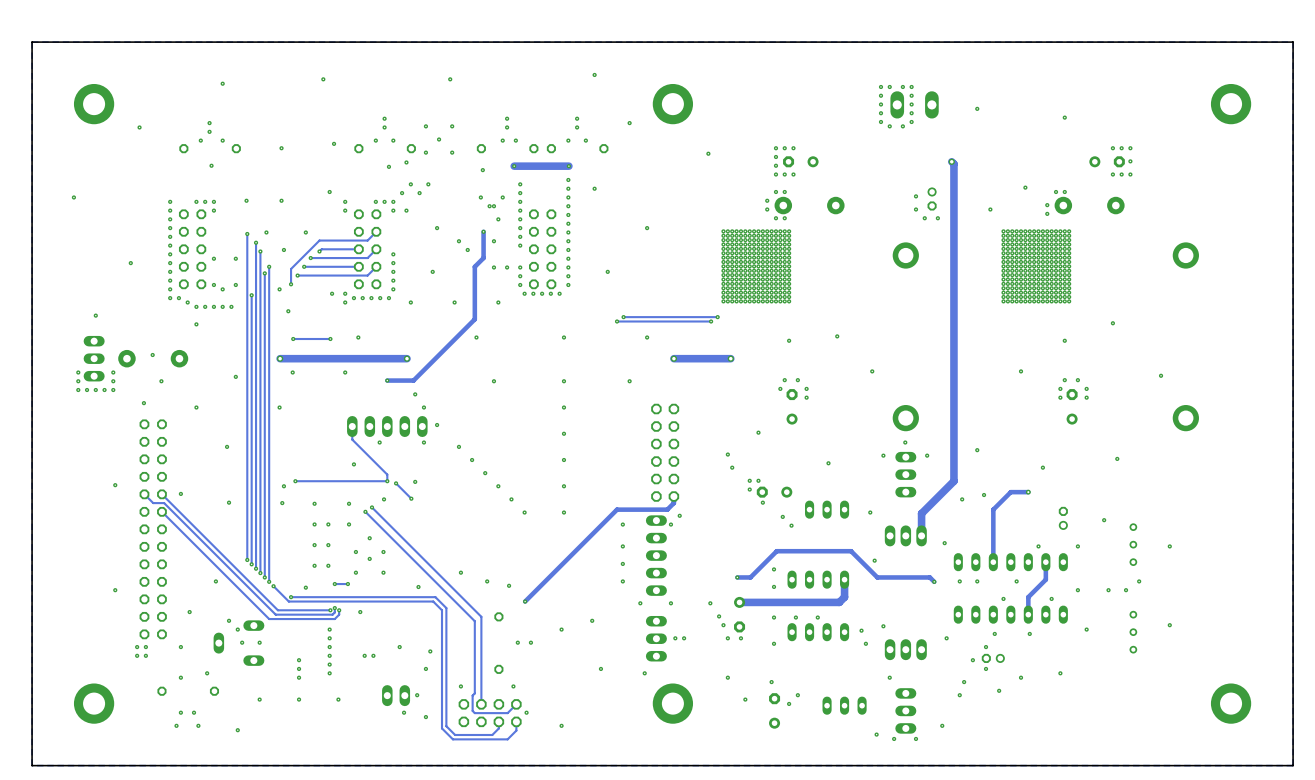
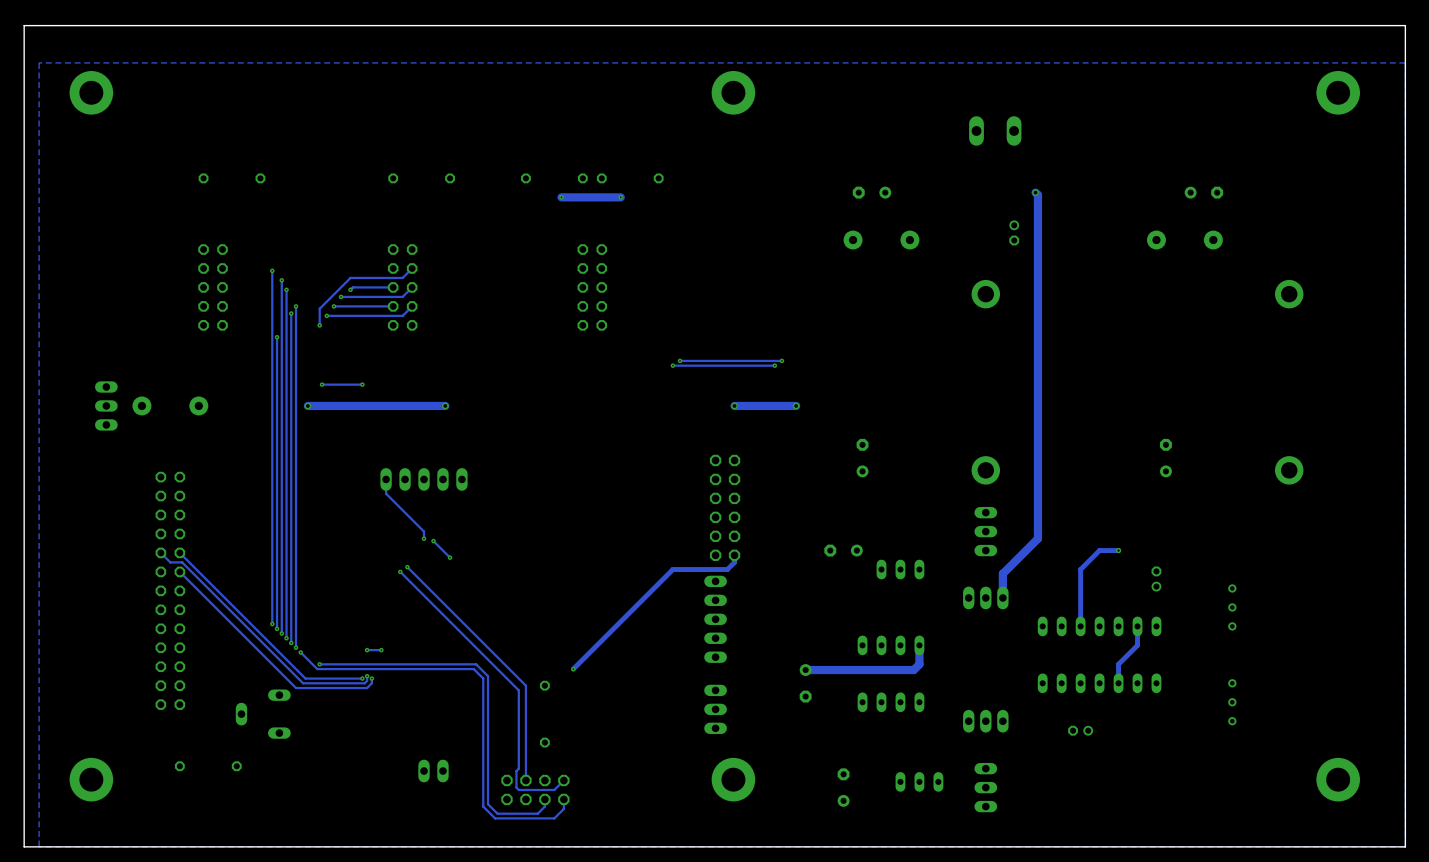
board edge: (1293, 42) (32, 42) (32, 765) -> (1405, 62) (1405, 25) (24, 25) (24, 846) (39, 846)
via: (594, 74) -> none
via: (323, 79) -> none
via: (450, 79) -> none
via: (222, 83) -> none
via: (881, 86) -> none
via: (889, 86) -> none
via: (902, 86) -> none
via: (911, 86) -> none
via: (881, 95) -> none
via: (911, 95) -> none
part position: (94, 104) -> (91, 92)
part position: (672, 104) -> (733, 92)
via: (881, 104) -> none
via: (911, 104) -> none
part position: (1231, 104) -> (1338, 92)
via: (977, 108) -> none
via: (881, 113) -> none
via: (911, 113) -> none
via: (1064, 117) -> none
via: (384, 118) -> none
via: (507, 118) -> none
via: (577, 118) -> none
via: (881, 121) -> none
via: (911, 121) -> none
via: (209, 123) -> none
via: (629, 123) -> none
via: (425, 126) -> none
via: (452, 126) -> none
via: (889, 126) -> none
via: (902, 126) -> none
via: (139, 127) -> none
via: (384, 127) -> none
via: (507, 127) -> none
via: (577, 127) -> none
via: (209, 131) -> none
via: (439, 139) -> none
via: (200, 140) -> none
via: (222, 140) -> none
via: (375, 140) -> none
via: (393, 140) -> none
via: (502, 140) -> none
via: (515, 140) -> none
via: (568, 140) -> none
via: (585, 140) -> none
via: (334, 143) -> none
via: (281, 148) -> none
via: (775, 148) -> none
via: (784, 148) -> none
via: (793, 148) -> none
via: (1112, 148) -> none
via: (1121, 148) -> none
via: (1130, 148) -> none
via: (425, 152) -> none
via: (452, 152) -> none
via: (708, 153) -> none
via: (775, 156) -> none
via: (1130, 161) -> none
via: (406, 162) -> none
via: (211, 165) -> none
via: (775, 165) -> none
via: (388, 166) -> none
via: (482, 170) -> none
via: (775, 174) -> none
via: (784, 174) -> none
via: (793, 174) -> none
via: (1112, 174) -> none
via: (1121, 174) -> none
via: (1130, 174) -> none
via: (568, 179) -> none
via: (410, 184) -> none
via: (428, 184) -> none
via: (520, 184) -> none
via: (1025, 187) -> none
via: (568, 188) -> none
via: (594, 188) -> none
via: (329, 192) -> none
via: (775, 192) -> none
via: (784, 192) -> none
via: (1056, 192) -> none
via: (1064, 192) -> none
via: (402, 193) -> none
via: (419, 193) -> none
via: (520, 193) -> none
via: (916, 196) -> none
via: (73, 197) -> none
via: (480, 197) -> none
via: (502, 197) -> none
via: (568, 197) -> none
via: (246, 200) -> none
via: (281, 200) -> none
via: (767, 200) -> none
via: (170, 201) -> none
via: (196, 201) -> none
via: (205, 201) -> none
via: (213, 201) -> none
via: (345, 201) -> none
via: (375, 201) -> none
via: (384, 201) -> none
via: (393, 201) -> none
via: (520, 201) -> none
via: (1047, 205) -> none
via: (489, 206) -> none
via: (493, 206) -> none
via: (568, 206) -> none
via: (767, 209) -> none
via: (916, 209) -> none
via: (990, 209) -> none
via: (170, 210) -> none
via: (213, 210) -> none
via: (345, 210) -> none
via: (393, 210) -> none
via: (406, 210) -> none
via: (520, 210) -> none
via: (1047, 213) -> none
via: (568, 214) -> none
via: (775, 218) -> none
via: (784, 218) -> none
via: (924, 218) -> none
via: (937, 218) -> none
via: (170, 219) -> none
via: (498, 219) -> none
via: (520, 219) -> none
via: (568, 223) -> none
via: (170, 228) -> none
via: (437, 228) -> none
via: (520, 228) -> none
via: (647, 228) -> none
track: (483, 231) (483, 258) (474, 266) (474, 319) (413, 380) (387, 380) -> none
via: (483, 231) -> none
via: (723, 231) -> none
via: (727, 231) -> none
via: (732, 231) -> none
via: (736, 231) -> none
via: (740, 231) -> none
via: (745, 231) -> none
via: (749, 231) -> none
via: (754, 231) -> none
via: (758, 231) -> none
via: (762, 231) -> none
via: (767, 231) -> none
via: (771, 231) -> none
via: (775, 231) -> none
via: (780, 231) -> none
via: (784, 231) -> none
via: (789, 231) -> none
via: (1003, 231) -> none
via: (1007, 231) -> none
via: (1012, 231) -> none
via: (1016, 231) -> none
via: (1021, 231) -> none
via: (1025, 231) -> none
via: (1029, 231) -> none
via: (1034, 231) -> none
via: (1038, 231) -> none
via: (1042, 231) -> none
via: (1047, 231) -> none
via: (1051, 231) -> none
via: (1056, 231) -> none
via: (1060, 231) -> none
via: (1064, 231) -> none
via: (1069, 231) -> none
via: (266, 232) -> none
via: (305, 232) -> none
via: (568, 232) -> none
via: (723, 235) -> none
via: (727, 235) -> none
via: (732, 235) -> none
via: (736, 235) -> none
via: (740, 235) -> none
via: (745, 235) -> none
via: (749, 235) -> none
via: (754, 235) -> none
via: (758, 235) -> none
via: (762, 235) -> none
via: (767, 235) -> none
via: (771, 235) -> none
via: (775, 235) -> none
via: (780, 235) -> none
via: (784, 235) -> none
via: (789, 235) -> none
via: (1003, 235) -> none
via: (1007, 235) -> none
via: (1012, 235) -> none
via: (1016, 235) -> none
via: (1021, 235) -> none
via: (1025, 235) -> none
via: (1029, 235) -> none
via: (1034, 235) -> none
via: (1038, 235) -> none
via: (1042, 235) -> none
via: (1047, 235) -> none
via: (1051, 235) -> none
via: (1056, 235) -> none
via: (1060, 235) -> none
via: (1064, 235) -> none
via: (1069, 235) -> none
via: (170, 236) -> none
via: (520, 236) -> none
via: (723, 240) -> none
via: (727, 240) -> none
via: (732, 240) -> none
via: (736, 240) -> none
via: (740, 240) -> none
via: (745, 240) -> none
via: (749, 240) -> none
via: (754, 240) -> none
via: (758, 240) -> none
via: (762, 240) -> none
via: (767, 240) -> none
via: (771, 240) -> none
via: (775, 240) -> none
via: (780, 240) -> none
via: (784, 240) -> none
via: (789, 240) -> none
via: (1003, 240) -> none
via: (1007, 240) -> none
via: (1012, 240) -> none
via: (1016, 240) -> none
via: (1021, 240) -> none
via: (1025, 240) -> none
via: (1029, 240) -> none
via: (1034, 240) -> none
via: (1038, 240) -> none
via: (1042, 240) -> none
via: (1047, 240) -> none
via: (1051, 240) -> none
via: (1056, 240) -> none
via: (1060, 240) -> none
via: (1064, 240) -> none
via: (1069, 240) -> none
via: (458, 241) -> none
via: (493, 241) -> none
via: (568, 241) -> none
via: (723, 244) -> none
via: (727, 244) -> none
via: (732, 244) -> none
via: (736, 244) -> none
via: (740, 244) -> none
via: (745, 244) -> none
via: (749, 244) -> none
via: (754, 244) -> none
via: (758, 244) -> none
via: (762, 244) -> none
via: (767, 244) -> none
via: (771, 244) -> none
via: (775, 244) -> none
via: (780, 244) -> none
via: (784, 244) -> none
via: (789, 244) -> none
via: (1003, 244) -> none
via: (1007, 244) -> none
via: (1012, 244) -> none
via: (1016, 244) -> none
via: (1021, 244) -> none
via: (1025, 244) -> none
via: (1029, 244) -> none
via: (1034, 244) -> none
via: (1038, 244) -> none
via: (1042, 244) -> none
via: (1047, 244) -> none
via: (1051, 244) -> none
via: (1056, 244) -> none
via: (1060, 244) -> none
via: (1064, 244) -> none
via: (1069, 244) -> none
via: (170, 245) -> none
via: (520, 245) -> none
via: (723, 248) -> none
via: (727, 248) -> none
via: (732, 248) -> none
via: (736, 248) -> none
via: (740, 248) -> none
via: (745, 248) -> none
via: (749, 248) -> none
via: (754, 248) -> none
via: (758, 248) -> none
via: (762, 248) -> none
via: (767, 248) -> none
via: (771, 248) -> none
via: (775, 248) -> none
via: (780, 248) -> none
via: (784, 248) -> none
via: (789, 248) -> none
via: (1003, 248) -> none
via: (1007, 248) -> none
via: (1012, 248) -> none
via: (1016, 248) -> none
via: (1021, 248) -> none
via: (1025, 248) -> none
via: (1029, 248) -> none
via: (1034, 248) -> none
via: (1038, 248) -> none
via: (1042, 248) -> none
via: (1047, 248) -> none
via: (1051, 248) -> none
via: (1056, 248) -> none
via: (1060, 248) -> none
via: (1064, 248) -> none
via: (1069, 248) -> none
via: (283, 249) -> none
via: (467, 249) -> none
via: (568, 249) -> none
via: (723, 253) -> none
via: (727, 253) -> none
via: (732, 253) -> none
via: (736, 253) -> none
via: (740, 253) -> none
via: (745, 253) -> none
via: (749, 253) -> none
via: (754, 253) -> none
via: (758, 253) -> none
via: (762, 253) -> none
via: (767, 253) -> none
via: (771, 253) -> none
via: (775, 253) -> none
via: (780, 253) -> none
via: (784, 253) -> none
via: (789, 253) -> none
via: (1003, 253) -> none
via: (1007, 253) -> none
via: (1012, 253) -> none
via: (1016, 253) -> none
via: (1021, 253) -> none
via: (1025, 253) -> none
via: (1029, 253) -> none
via: (1034, 253) -> none
via: (1038, 253) -> none
via: (1042, 253) -> none
via: (1047, 253) -> none
via: (1051, 253) -> none
via: (1056, 253) -> none
via: (1060, 253) -> none
via: (1064, 253) -> none
via: (1069, 253) -> none
via: (170, 254) -> none
via: (393, 254) -> none
via: (723, 257) -> none
via: (727, 257) -> none
via: (732, 257) -> none
via: (736, 257) -> none
via: (740, 257) -> none
via: (745, 257) -> none
via: (749, 257) -> none
via: (754, 257) -> none
via: (758, 257) -> none
via: (762, 257) -> none
via: (767, 257) -> none
via: (771, 257) -> none
via: (775, 257) -> none
via: (780, 257) -> none
via: (784, 257) -> none
via: (789, 257) -> none
via: (1003, 257) -> none
via: (1007, 257) -> none
via: (1012, 257) -> none
via: (1016, 257) -> none
via: (1021, 257) -> none
via: (1025, 257) -> none
via: (1029, 257) -> none
via: (1034, 257) -> none
via: (1038, 257) -> none
via: (1042, 257) -> none
via: (1047, 257) -> none
via: (1051, 257) -> none
via: (1056, 257) -> none
via: (1060, 257) -> none
via: (1064, 257) -> none
via: (1069, 257) -> none
via: (213, 258) -> none
via: (235, 258) -> none
via: (568, 258) -> none
via: (723, 262) -> none
via: (727, 262) -> none
via: (732, 262) -> none
via: (736, 262) -> none
via: (740, 262) -> none
via: (745, 262) -> none
via: (749, 262) -> none
via: (754, 262) -> none
via: (758, 262) -> none
via: (762, 262) -> none
via: (767, 262) -> none
via: (771, 262) -> none
via: (775, 262) -> none
via: (780, 262) -> none
via: (784, 262) -> none
via: (789, 262) -> none
via: (1003, 262) -> none
via: (1007, 262) -> none
via: (1012, 262) -> none
via: (1016, 262) -> none
via: (1021, 262) -> none
via: (1025, 262) -> none
via: (1029, 262) -> none
via: (1034, 262) -> none
via: (1038, 262) -> none
via: (1042, 262) -> none
via: (1047, 262) -> none
via: (1051, 262) -> none
via: (1056, 262) -> none
via: (1060, 262) -> none
via: (1064, 262) -> none
via: (1069, 262) -> none
via: (130, 263) -> none
via: (170, 263) -> none
via: (393, 263) -> none
via: (723, 266) -> none
via: (727, 266) -> none
via: (732, 266) -> none
via: (736, 266) -> none
via: (740, 266) -> none
via: (745, 266) -> none
via: (749, 266) -> none
via: (754, 266) -> none
via: (758, 266) -> none
via: (762, 266) -> none
via: (767, 266) -> none
via: (771, 266) -> none
via: (775, 266) -> none
via: (780, 266) -> none
via: (784, 266) -> none
via: (789, 266) -> none
via: (1003, 266) -> none
via: (1007, 266) -> none
via: (1012, 266) -> none
via: (1016, 266) -> none
via: (1021, 266) -> none
via: (1025, 266) -> none
via: (1029, 266) -> none
via: (1034, 266) -> none
via: (1038, 266) -> none
via: (1042, 266) -> none
via: (1047, 266) -> none
via: (1051, 266) -> none
via: (1056, 266) -> none
via: (1060, 266) -> none
via: (1064, 266) -> none
via: (1069, 266) -> none
via: (493, 267) -> none
via: (507, 267) -> none
via: (520, 267) -> none
via: (568, 267) -> none
via: (723, 270) -> none
via: (727, 270) -> none
via: (732, 270) -> none
via: (736, 270) -> none
via: (740, 270) -> none
via: (745, 270) -> none
via: (749, 270) -> none
via: (754, 270) -> none
via: (758, 270) -> none
via: (762, 270) -> none
via: (767, 270) -> none
via: (771, 270) -> none
via: (775, 270) -> none
via: (780, 270) -> none
via: (784, 270) -> none
via: (789, 270) -> none
via: (1003, 270) -> none
via: (1007, 270) -> none
via: (1012, 270) -> none
via: (1016, 270) -> none
via: (1021, 270) -> none
via: (1025, 270) -> none
via: (1029, 270) -> none
via: (1034, 270) -> none
via: (1038, 270) -> none
via: (1042, 270) -> none
via: (1047, 270) -> none
via: (1051, 270) -> none
via: (1056, 270) -> none
via: (1060, 270) -> none
via: (1064, 270) -> none
via: (1069, 270) -> none
via: (170, 271) -> none
via: (393, 271) -> none
via: (432, 271) -> none
via: (607, 271) -> none
via: (723, 275) -> none
via: (727, 275) -> none
via: (732, 275) -> none
via: (736, 275) -> none
via: (740, 275) -> none
via: (745, 275) -> none
via: (749, 275) -> none
via: (754, 275) -> none
via: (758, 275) -> none
via: (762, 275) -> none
via: (767, 275) -> none
via: (771, 275) -> none
via: (775, 275) -> none
via: (780, 275) -> none
via: (784, 275) -> none
via: (789, 275) -> none
via: (1003, 275) -> none
via: (1007, 275) -> none
via: (1012, 275) -> none
via: (1016, 275) -> none
via: (1021, 275) -> none
via: (1025, 275) -> none
via: (1029, 275) -> none
via: (1034, 275) -> none
via: (1038, 275) -> none
via: (1042, 275) -> none
via: (1047, 275) -> none
via: (1051, 275) -> none
via: (1056, 275) -> none
via: (1060, 275) -> none
via: (1064, 275) -> none
via: (1069, 275) -> none
via: (520, 276) -> none
via: (568, 276) -> none
via: (723, 279) -> none
via: (727, 279) -> none
via: (732, 279) -> none
via: (736, 279) -> none
via: (740, 279) -> none
via: (745, 279) -> none
via: (749, 279) -> none
via: (754, 279) -> none
via: (758, 279) -> none
via: (762, 279) -> none
via: (767, 279) -> none
via: (771, 279) -> none
via: (775, 279) -> none
via: (780, 279) -> none
via: (784, 279) -> none
via: (789, 279) -> none
via: (1003, 279) -> none
via: (1007, 279) -> none
via: (1012, 279) -> none
via: (1016, 279) -> none
via: (1021, 279) -> none
via: (1025, 279) -> none
via: (1029, 279) -> none
via: (1034, 279) -> none
via: (1038, 279) -> none
via: (1042, 279) -> none
via: (1047, 279) -> none
via: (1051, 279) -> none
via: (1056, 279) -> none
via: (1060, 279) -> none
via: (1064, 279) -> none
via: (1069, 279) -> none
via: (170, 280) -> none
via: (393, 280) -> none
via: (723, 283) -> none
via: (727, 283) -> none
via: (732, 283) -> none
via: (736, 283) -> none
via: (740, 283) -> none
via: (745, 283) -> none
via: (749, 283) -> none
via: (754, 283) -> none
via: (758, 283) -> none
via: (762, 283) -> none
via: (767, 283) -> none
via: (771, 283) -> none
via: (775, 283) -> none
via: (780, 283) -> none
via: (784, 283) -> none
via: (789, 283) -> none
via: (1003, 283) -> none
via: (1007, 283) -> none
via: (1012, 283) -> none
via: (1016, 283) -> none
via: (1021, 283) -> none
via: (1025, 283) -> none
via: (1029, 283) -> none
via: (1034, 283) -> none
via: (1038, 283) -> none
via: (1042, 283) -> none
via: (1047, 283) -> none
via: (1051, 283) -> none
via: (1056, 283) -> none
via: (1060, 283) -> none
via: (1064, 283) -> none
via: (1069, 283) -> none
via: (213, 284) -> none
via: (235, 284) -> none
via: (520, 284) -> none
via: (568, 284) -> none
via: (723, 288) -> none
via: (727, 288) -> none
via: (732, 288) -> none
via: (736, 288) -> none
via: (740, 288) -> none
via: (745, 288) -> none
via: (749, 288) -> none
via: (754, 288) -> none
via: (758, 288) -> none
via: (762, 288) -> none
via: (767, 288) -> none
via: (771, 288) -> none
via: (775, 288) -> none
via: (780, 288) -> none
via: (784, 288) -> none
via: (789, 288) -> none
via: (1003, 288) -> none
via: (1007, 288) -> none
via: (1012, 288) -> none
via: (1016, 288) -> none
via: (1021, 288) -> none
via: (1025, 288) -> none
via: (1029, 288) -> none
via: (1034, 288) -> none
via: (1038, 288) -> none
via: (1042, 288) -> none
via: (1047, 288) -> none
via: (1051, 288) -> none
via: (1056, 288) -> none
via: (1060, 288) -> none
via: (1064, 288) -> none
via: (1069, 288) -> none
via: (170, 289) -> none
via: (222, 289) -> none
via: (279, 289) -> none
via: (393, 289) -> none
via: (723, 292) -> none
via: (727, 292) -> none
via: (732, 292) -> none
via: (736, 292) -> none
via: (740, 292) -> none
via: (745, 292) -> none
via: (749, 292) -> none
via: (754, 292) -> none
via: (758, 292) -> none
via: (762, 292) -> none
via: (767, 292) -> none
via: (771, 292) -> none
via: (775, 292) -> none
via: (780, 292) -> none
via: (784, 292) -> none
via: (789, 292) -> none
via: (1003, 292) -> none
via: (1007, 292) -> none
via: (1012, 292) -> none
via: (1016, 292) -> none
via: (1021, 292) -> none
via: (1025, 292) -> none
via: (1029, 292) -> none
via: (1034, 292) -> none
via: (1038, 292) -> none
via: (1042, 292) -> none
via: (1047, 292) -> none
via: (1051, 292) -> none
via: (1056, 292) -> none
via: (1060, 292) -> none
via: (1064, 292) -> none
via: (1069, 292) -> none
via: (332, 293) -> none
via: (345, 293) -> none
via: (524, 293) -> none
via: (533, 293) -> none
via: (542, 293) -> none
via: (550, 293) -> none
via: (559, 293) -> none
via: (723, 297) -> none
via: (727, 297) -> none
via: (732, 297) -> none
via: (736, 297) -> none
via: (740, 297) -> none
via: (745, 297) -> none
via: (749, 297) -> none
via: (754, 297) -> none
via: (758, 297) -> none
via: (762, 297) -> none
via: (767, 297) -> none
via: (771, 297) -> none
via: (775, 297) -> none
via: (780, 297) -> none
via: (784, 297) -> none
via: (789, 297) -> none
via: (1003, 297) -> none
via: (1007, 297) -> none
via: (1012, 297) -> none
via: (1016, 297) -> none
via: (1021, 297) -> none
via: (1025, 297) -> none
via: (1029, 297) -> none
via: (1034, 297) -> none
via: (1038, 297) -> none
via: (1042, 297) -> none
via: (1047, 297) -> none
via: (1051, 297) -> none
via: (1056, 297) -> none
via: (1060, 297) -> none
via: (1064, 297) -> none
via: (1069, 297) -> none
via: (170, 298) -> none
via: (178, 298) -> none
via: (353, 298) -> none
via: (362, 298) -> none
via: (371, 298) -> none
via: (380, 298) -> none
via: (388, 298) -> none
via: (723, 301) -> none
via: (727, 301) -> none
via: (732, 301) -> none
via: (736, 301) -> none
via: (740, 301) -> none
via: (745, 301) -> none
via: (749, 301) -> none
via: (754, 301) -> none
via: (758, 301) -> none
via: (762, 301) -> none
via: (767, 301) -> none
via: (771, 301) -> none
via: (775, 301) -> none
via: (780, 301) -> none
via: (784, 301) -> none
via: (789, 301) -> none
via: (1003, 301) -> none
via: (1007, 301) -> none
via: (1012, 301) -> none
via: (1016, 301) -> none
via: (1021, 301) -> none
via: (1025, 301) -> none
via: (1029, 301) -> none
via: (1034, 301) -> none
via: (1038, 301) -> none
via: (1042, 301) -> none
via: (1047, 301) -> none
via: (1051, 301) -> none
via: (1056, 301) -> none
via: (1060, 301) -> none
via: (1064, 301) -> none
via: (1069, 301) -> none
via: (187, 302) -> none
via: (345, 302) -> none
via: (410, 302) -> none
via: (454, 302) -> none
via: (498, 302) -> none
via: (196, 306) -> none
via: (205, 306) -> none
via: (213, 306) -> none
via: (222, 306) -> none
via: (231, 306) -> none
via: (288, 311) -> none
via: (95, 315) -> none
via: (1112, 323) -> none
via: (196, 324) -> none
via: (837, 336) -> none
via: (358, 337) -> none
via: (476, 337) -> none
via: (563, 337) -> none
via: (647, 337) -> none
via: (789, 340) -> none
via: (1064, 340) -> none
via: (152, 355) -> none
via: (872, 371) -> none
via: (1021, 371) -> none
via: (78, 372) -> none
via: (113, 372) -> none
via: (292, 372) -> none
via: (345, 372) -> none
via: (1161, 375) -> none
via: (235, 376) -> none
via: (387, 380) -> none
via: (784, 380) -> none
via: (797, 380) -> none
via: (1064, 380) -> none
via: (1077, 380) -> none
via: (78, 381) -> none
via: (113, 381) -> none
via: (161, 381) -> none
via: (493, 381) -> none
via: (563, 381) -> none
via: (629, 381) -> none
via: (780, 388) -> none
via: (806, 388) -> none
via: (1060, 388) -> none
via: (1086, 388) -> none
via: (78, 390) -> none
via: (87, 390) -> none
via: (95, 390) -> none
via: (104, 390) -> none
via: (113, 390) -> none
via: (415, 394) -> none
via: (806, 397) -> none
via: (1060, 397) -> none
via: (1086, 397) -> none
via: (143, 403) -> none
via: (196, 407) -> none
via: (279, 407) -> none
via: (423, 407) -> none
via: (563, 407) -> none
via: (437, 425) -> none
via: (758, 432) -> none
via: (563, 433) -> none
via: (379, 442) -> none
via: (423, 442) -> none
via: (905, 442) -> none
via: (227, 446) -> none
via: (458, 446) -> none
via: (977, 450) -> none
via: (727, 454) -> none
via: (883, 455) -> none
via: (927, 455) -> none
via: (1117, 458) -> none
via: (472, 460) -> none
via: (563, 460) -> none
via: (828, 463) -> none
via: (353, 464) -> none
via: (732, 467) -> none
via: (1042, 467) -> none
via: (485, 473) -> none
via: (749, 480) -> none
via: (758, 480) -> none
via: (295, 481) -> none
track: (387, 481) (295, 481) -> none
via: (415, 481) -> none
via: (115, 485) -> none
via: (283, 486) -> none
via: (498, 486) -> none
via: (563, 486) -> none
via: (749, 489) -> none
via: (180, 493) -> none
via: (984, 495) -> none
via: (384, 499) -> none
via: (511, 499) -> none
via: (962, 499) -> none
via: (229, 502) -> none
via: (762, 502) -> none
via: (282, 503) -> none
via: (314, 503) -> none
via: (349, 503) -> none
via: (524, 512) -> none
via: (563, 512) -> none
via: (870, 512) -> none
via: (679, 515) -> none
via: (782, 516) -> none
via: (1104, 520) -> none
via: (314, 524) -> none
via: (328, 524) -> none
via: (349, 524) -> none
via: (622, 524) -> none
via: (670, 524) -> none
via: (791, 525) -> none
via: (369, 538) -> none
via: (944, 543) -> none
via: (314, 545) -> none
via: (328, 545) -> none
via: (622, 546) -> none
via: (1038, 546) -> none
via: (1077, 546) -> none
via: (1169, 546) -> none
via: (355, 552) -> none
via: (383, 552) -> none
via: (369, 558) -> none
via: (874, 560) -> none
via: (622, 563) -> none
via: (314, 565) -> none
via: (328, 565) -> none
via: (774, 569) -> none
via: (355, 572) -> none
via: (383, 572) -> none
via: (460, 572) -> none
track: (737, 577) (750, 577) (776, 551) (851, 551) (877, 577) (929, 577) (934, 581) -> none
via: (737, 577) -> none
via: (215, 581) -> none
via: (487, 581) -> none
via: (622, 581) -> none
via: (934, 581) -> none
via: (959, 581) -> none
via: (977, 581) -> none
via: (1016, 581) -> none
via: (1139, 581) -> none
via: (509, 585) -> none
via: (774, 586) -> none
via: (305, 587) -> none
via: (418, 587) -> none
via: (115, 590) -> none
via: (1077, 590) -> none
via: (1108, 590) -> none
via: (1126, 590) -> none
via: (1003, 598) -> none
via: (1051, 598) -> none
via: (640, 603) -> none
via: (670, 603) -> none
via: (710, 603) -> none
via: (189, 612) -> none
via: (360, 612) -> none
via: (719, 616) -> none
via: (774, 617) -> none
via: (795, 617) -> none
via: (817, 617) -> none
via: (229, 620) -> none
via: (592, 620) -> none
via: (723, 625) -> none
via: (1169, 625) -> none
via: (883, 626) -> none
via: (237, 629) -> none
via: (329, 629) -> none
via: (561, 629) -> none
via: (1086, 629) -> none
via: (861, 630) -> none
via: (994, 633) -> none
via: (1029, 633) -> none
via: (329, 638) -> none
via: (675, 638) -> none
via: (684, 638) -> none
via: (727, 638) -> none
via: (740, 638) -> none
via: (946, 638) -> none
via: (242, 642) -> none
via: (259, 642) -> none
via: (517, 642) -> none
via: (530, 642) -> none
via: (774, 643) -> none
via: (865, 643) -> none
via: (137, 647) -> none
via: (145, 647) -> none
via: (180, 647) -> none
via: (329, 647) -> none
via: (399, 647) -> none
via: (986, 647) -> none
via: (430, 651) -> none
via: (137, 655) -> none
via: (145, 655) -> none
via: (329, 655) -> none
via: (364, 655) -> none
via: (373, 655) -> none
via: (299, 660) -> none
via: (972, 660) -> none
via: (329, 664) -> none
via: (299, 668) -> none
via: (425, 668) -> none
via: (600, 668) -> none
via: (986, 668) -> none
via: (207, 673) -> none
via: (329, 673) -> none
via: (644, 673) -> none
via: (1060, 673) -> none
via: (180, 677) -> none
via: (299, 677) -> none
via: (727, 677) -> none
via: (889, 677) -> none
via: (1021, 677) -> none
via: (771, 682) -> none
via: (964, 682) -> none
via: (460, 686) -> none
via: (513, 686) -> none
via: (999, 690) -> none
via: (417, 695) -> none
via: (797, 695) -> none
via: (959, 695) -> none
via: (259, 699) -> none
via: (299, 699) -> none
via: (338, 699) -> none
via: (745, 699) -> none
part position: (94, 703) -> (91, 779)
via: (789, 703) -> none
via: (180, 712) -> none
via: (194, 712) -> none
via: (404, 712) -> none
via: (526, 712) -> none
via: (425, 717) -> none
via: (176, 725) -> none
via: (198, 725) -> none
via: (561, 725) -> none
via: (942, 725) -> none
via: (237, 730) -> none
via: (876, 734) -> none
via: (894, 738) -> none
via: (916, 738) -> none

